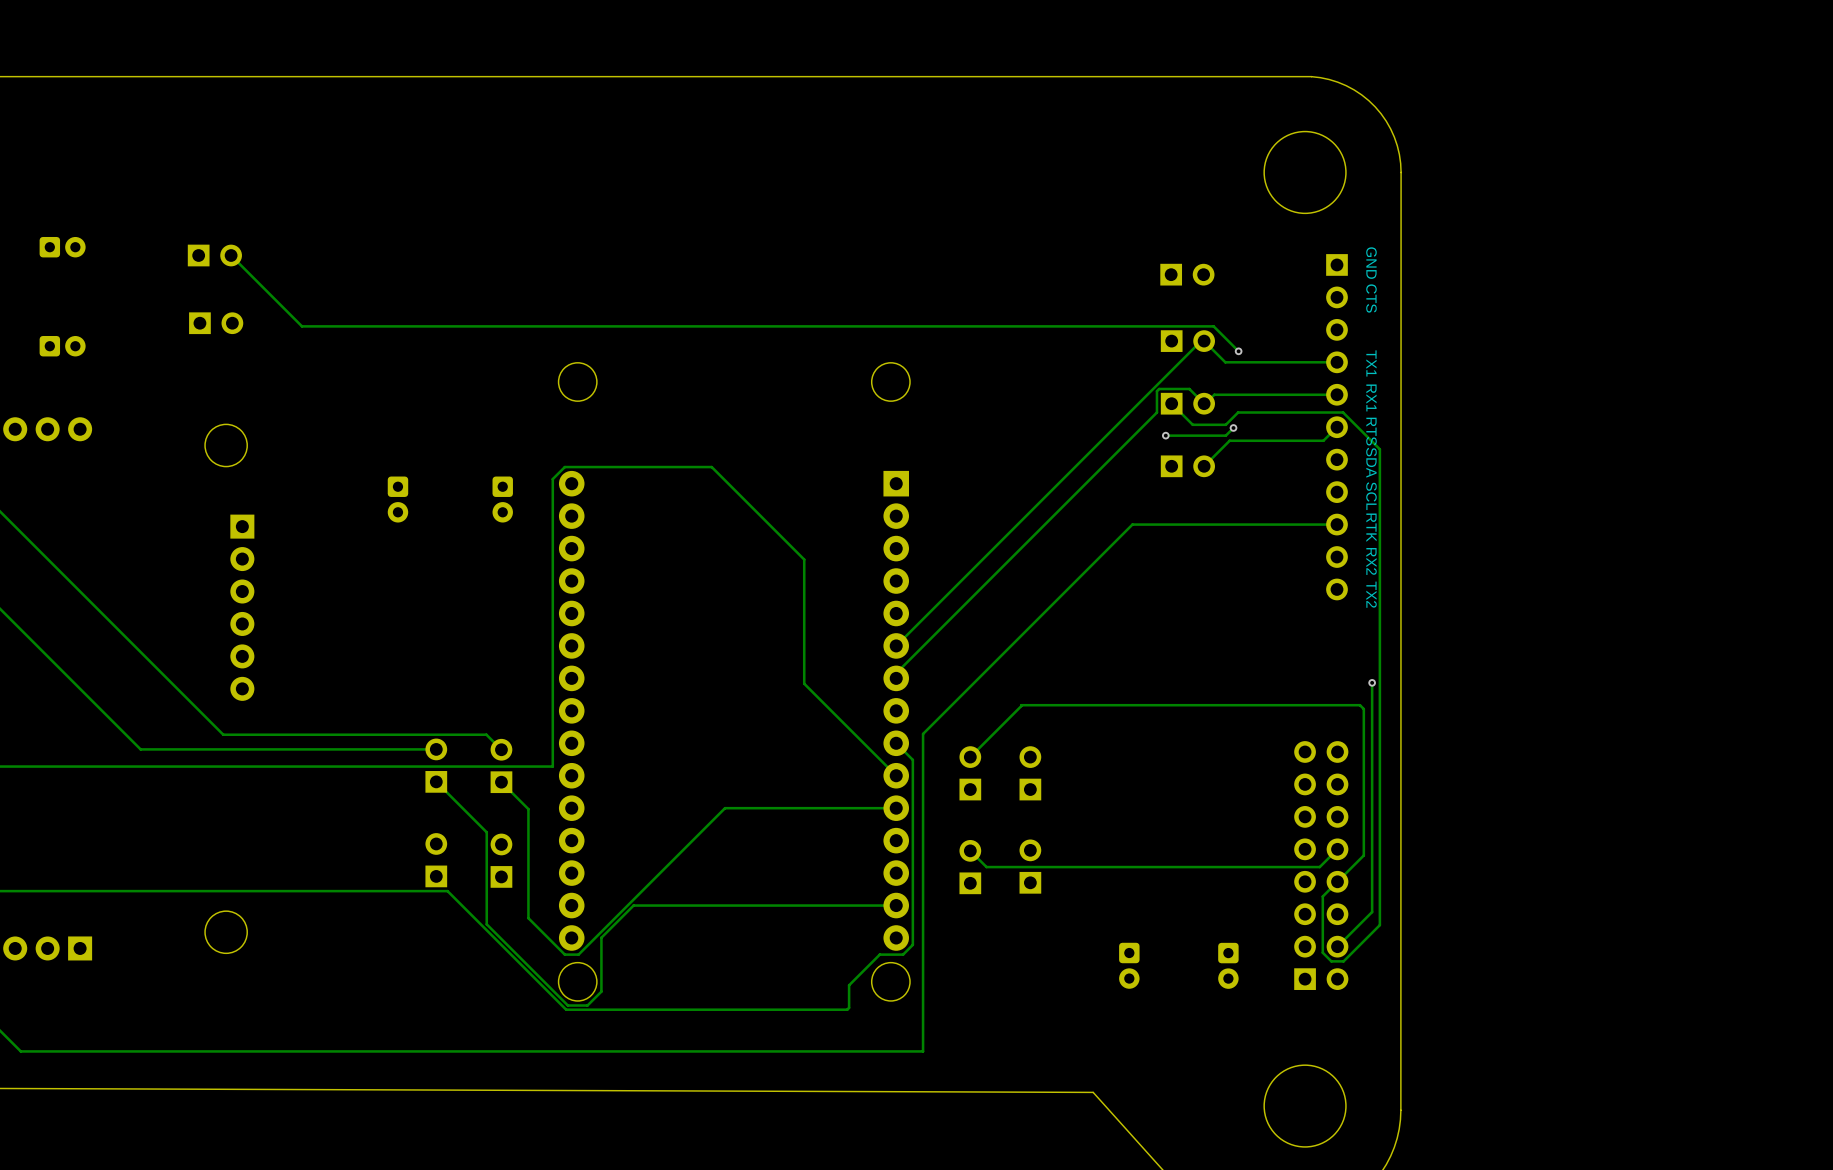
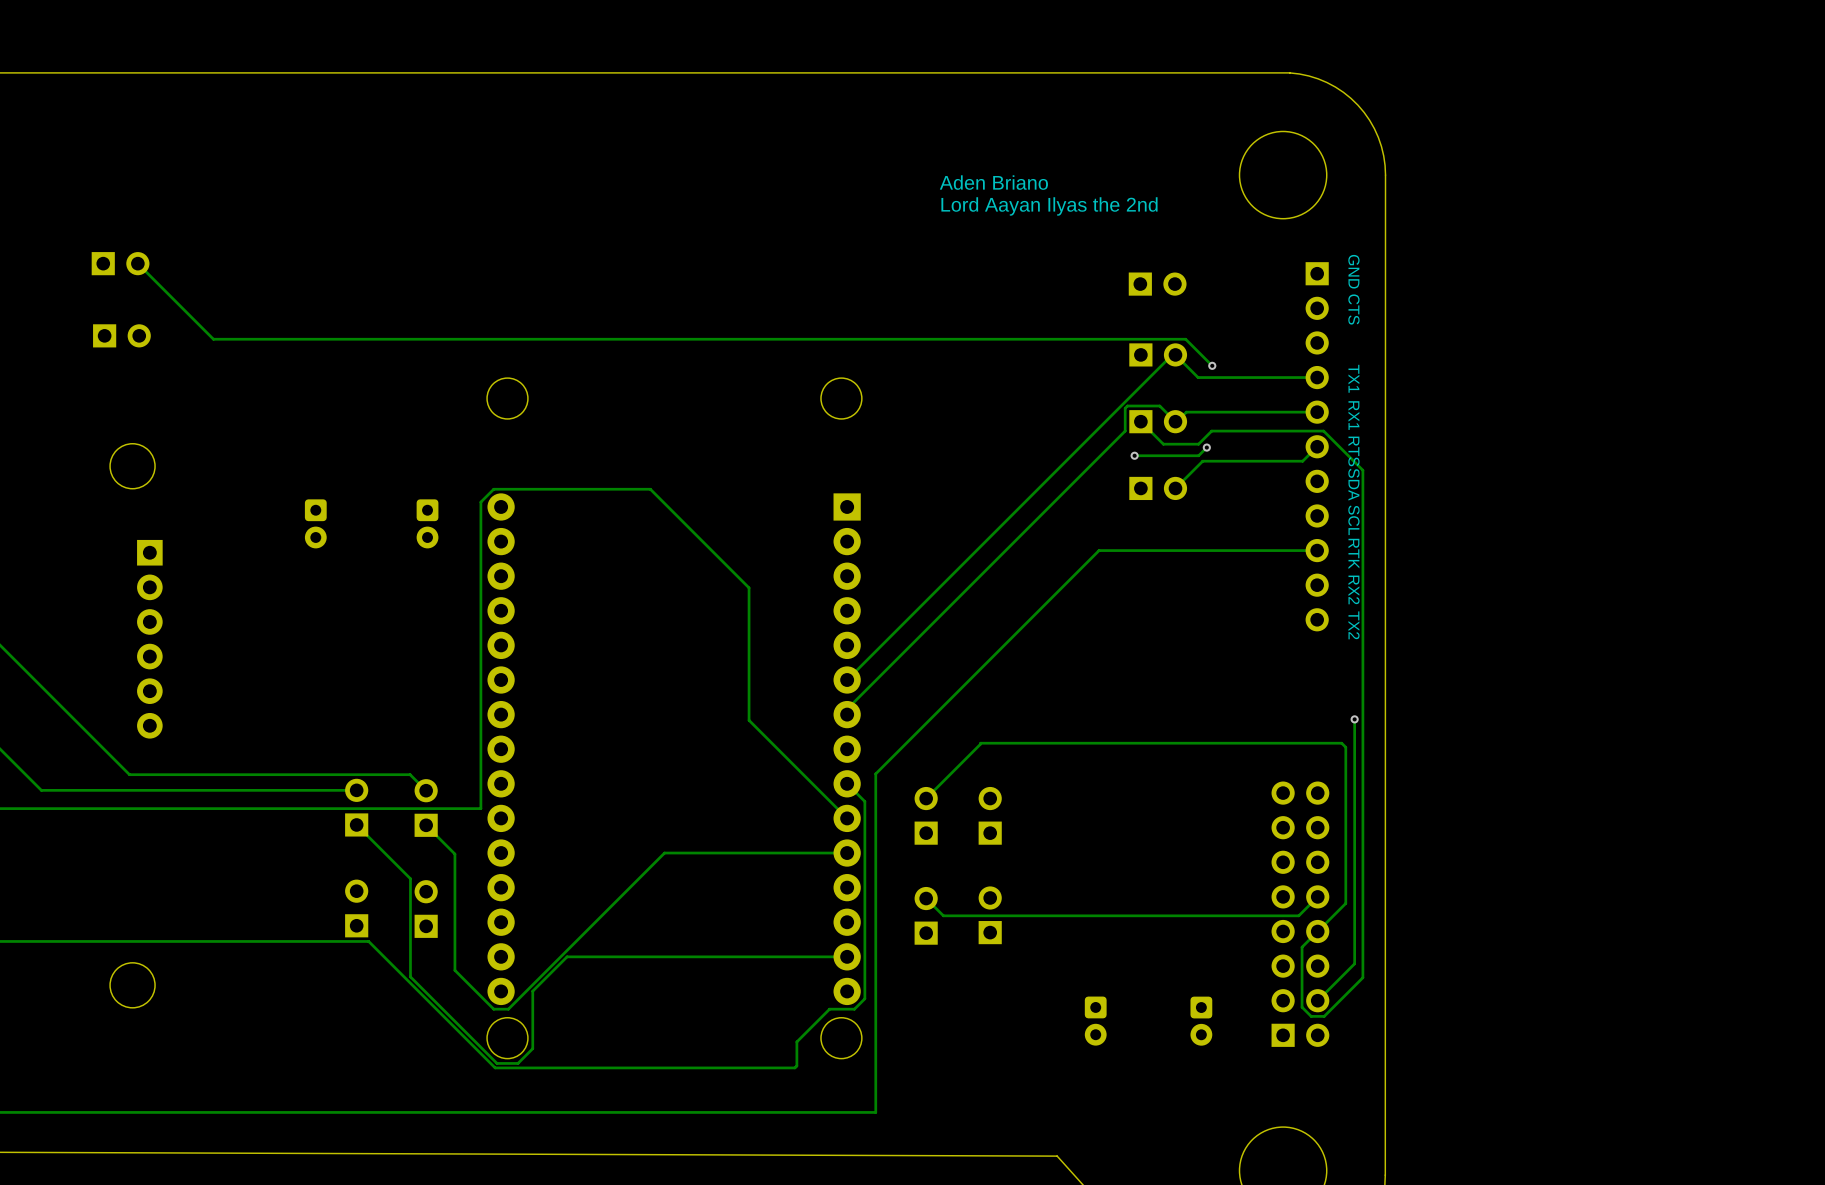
text: none -> Aden Briano (993, 182)
text: none -> Lord Aayan Ilyas the 2nd (1049, 206)

